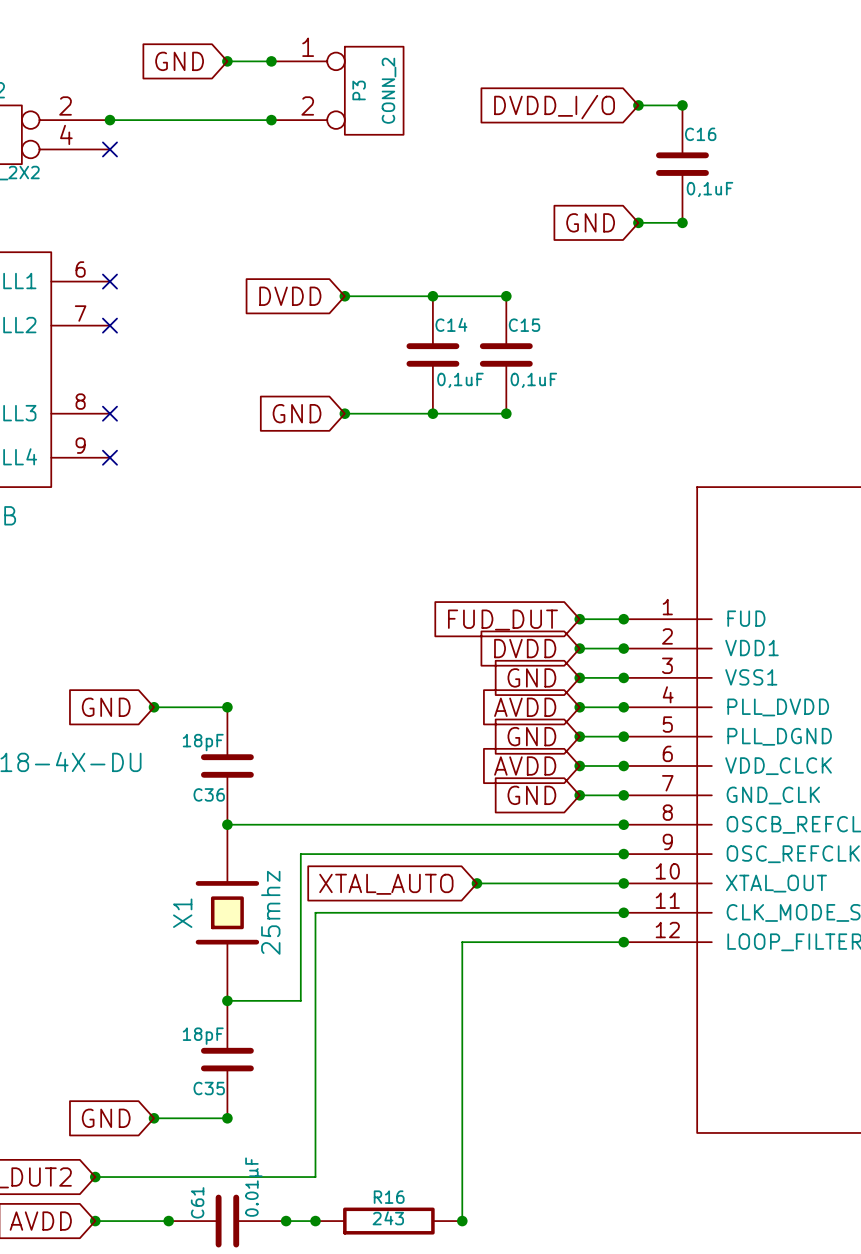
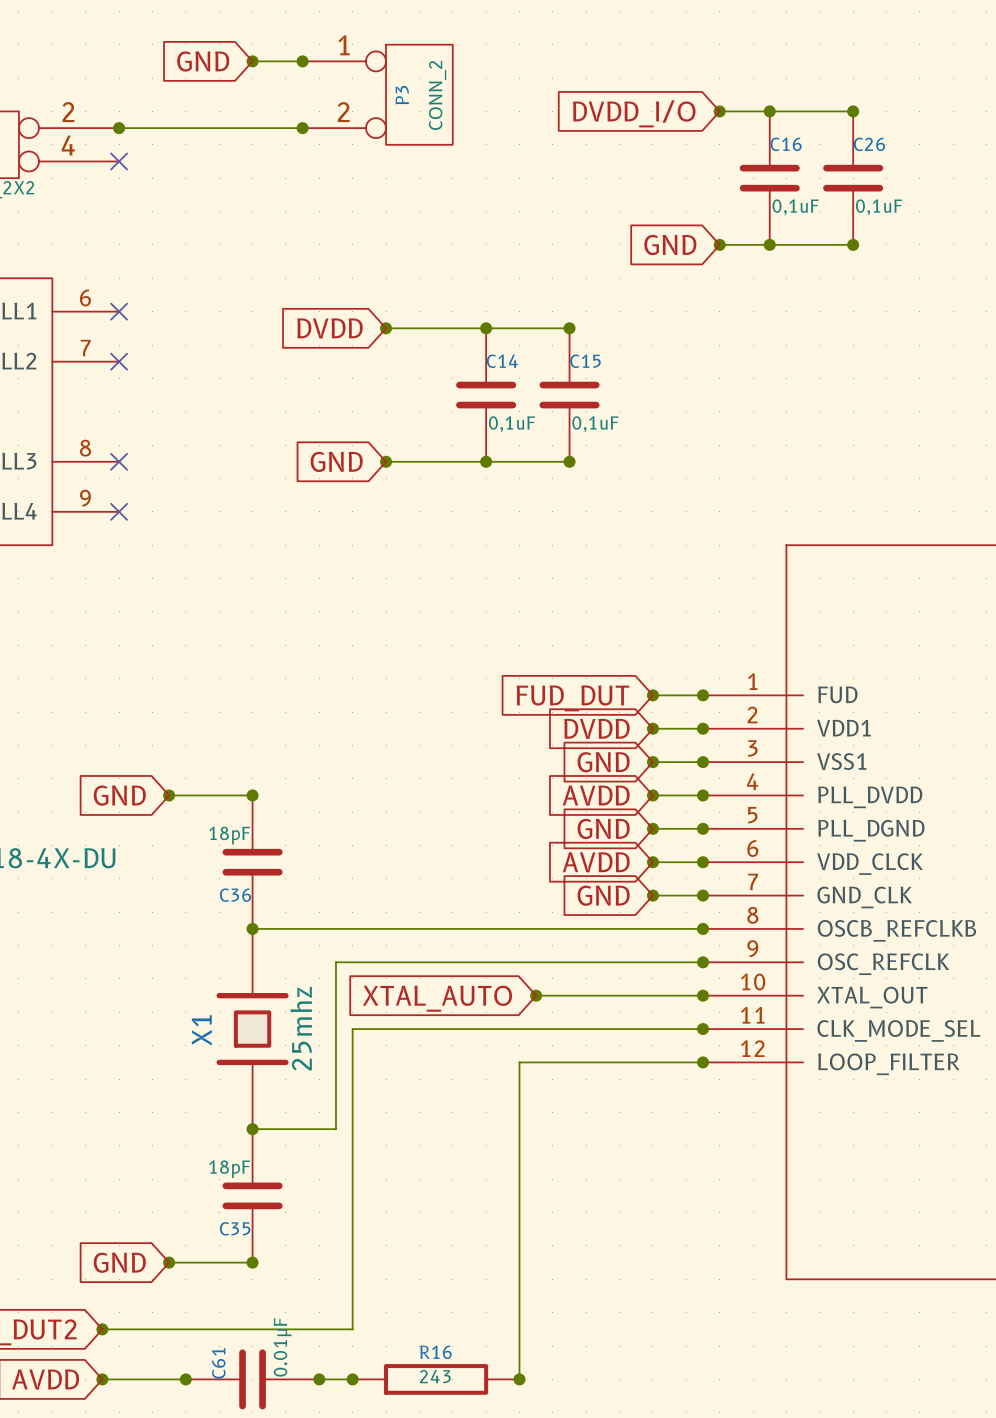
wire: none -> (769, 111) (853, 111)
junction: none -> (853, 111)
C26: none -> 0,1uF (853, 178)
wire: none -> (769, 244) (853, 244)
junction: none -> (853, 244)

